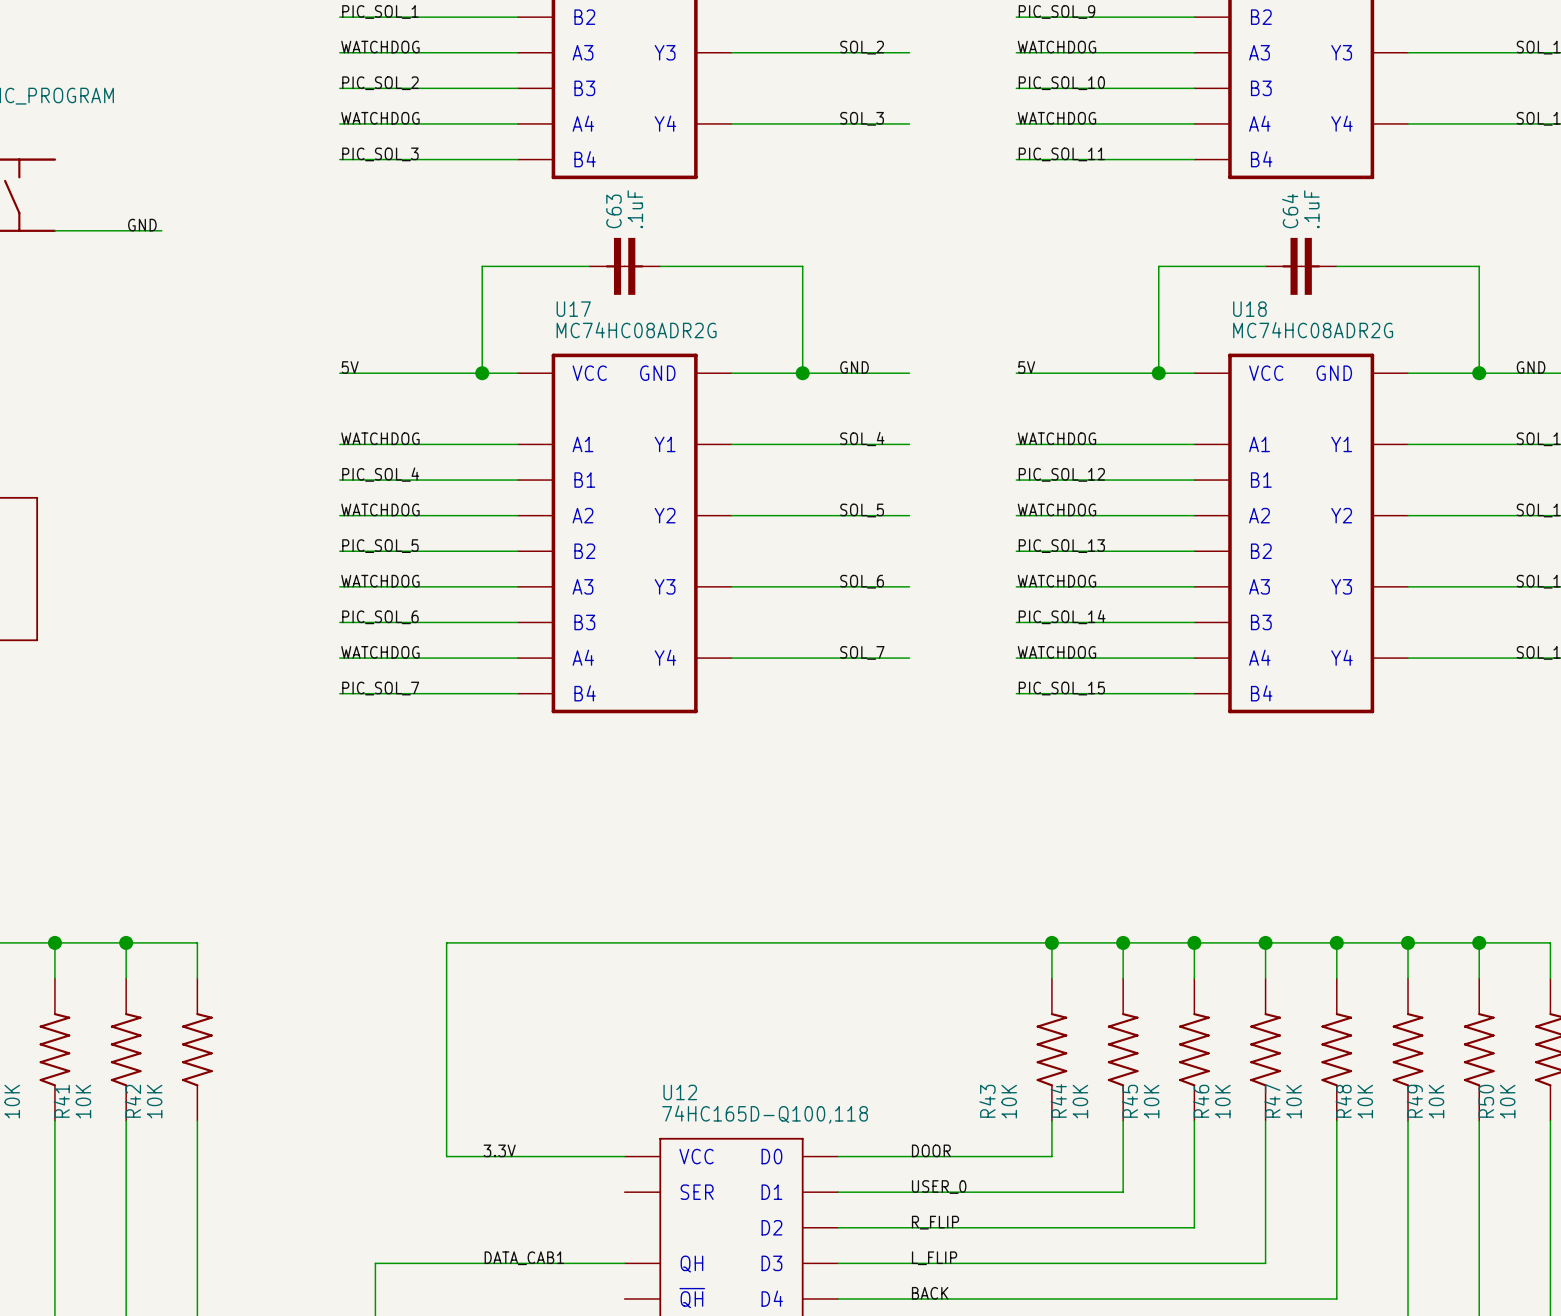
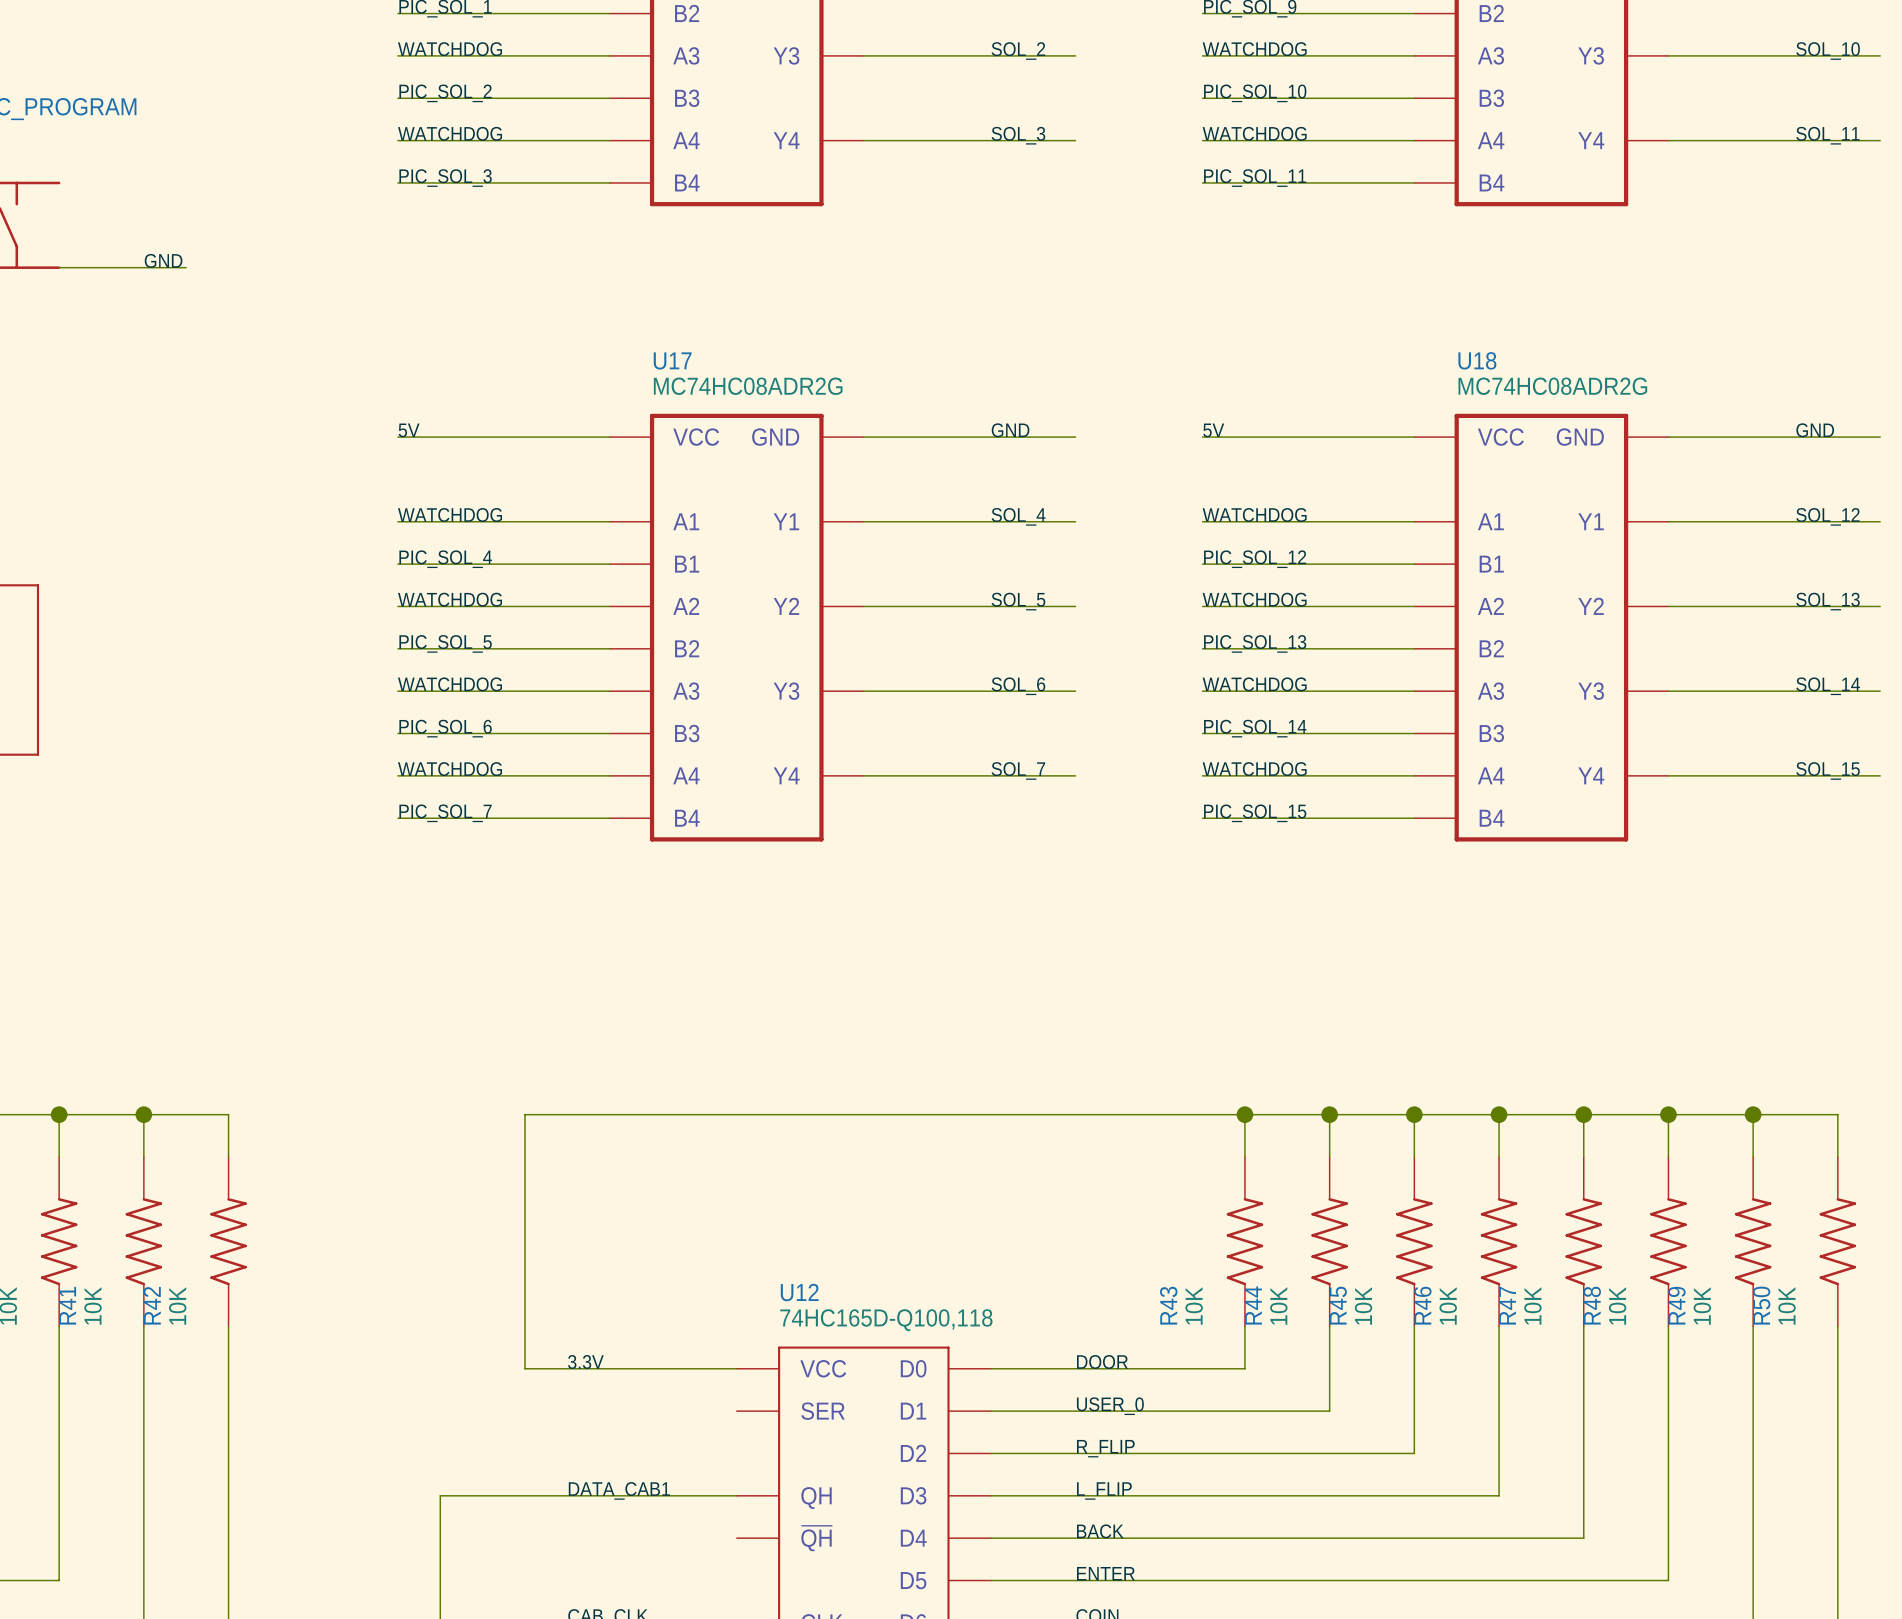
wire: (589, 266) (482, 266) (482, 373) -> none
C63: .1uF (624, 266) -> none
wire: (660, 266) (802, 266) (802, 373) -> none
wire: (1265, 266) (1158, 266) (1158, 373) -> none
C64: .1uF (1301, 266) -> none
wire: (1336, 266) (1479, 266) (1479, 373) -> none
junction: (482, 373) -> none
junction: (802, 373) -> none
junction: (1158, 373) -> none
junction: (1479, 373) -> none

